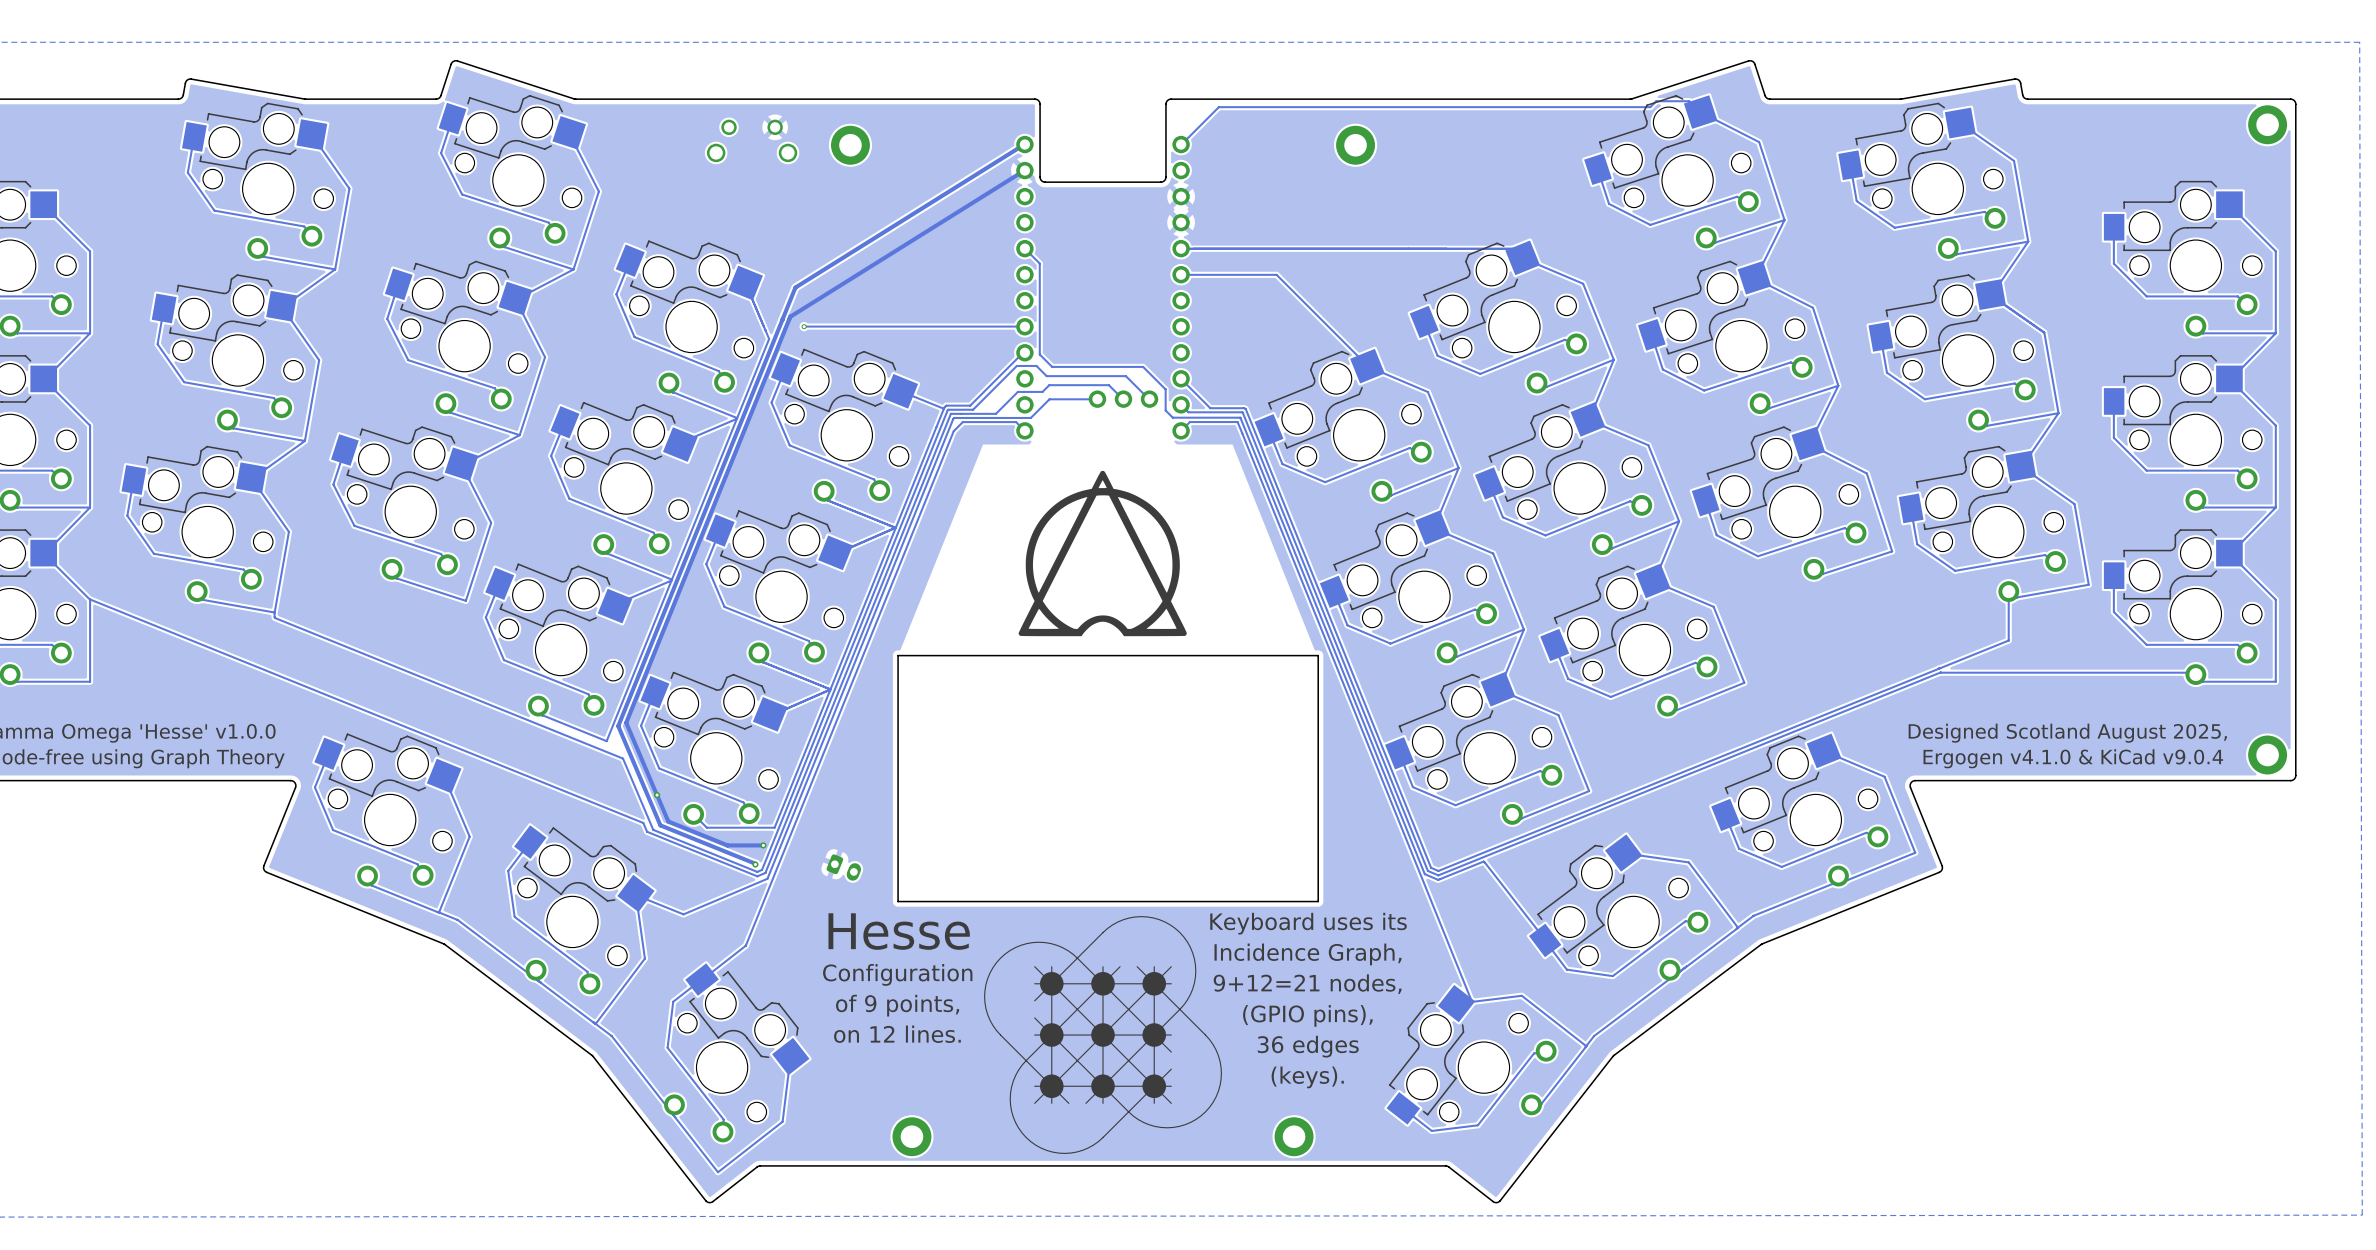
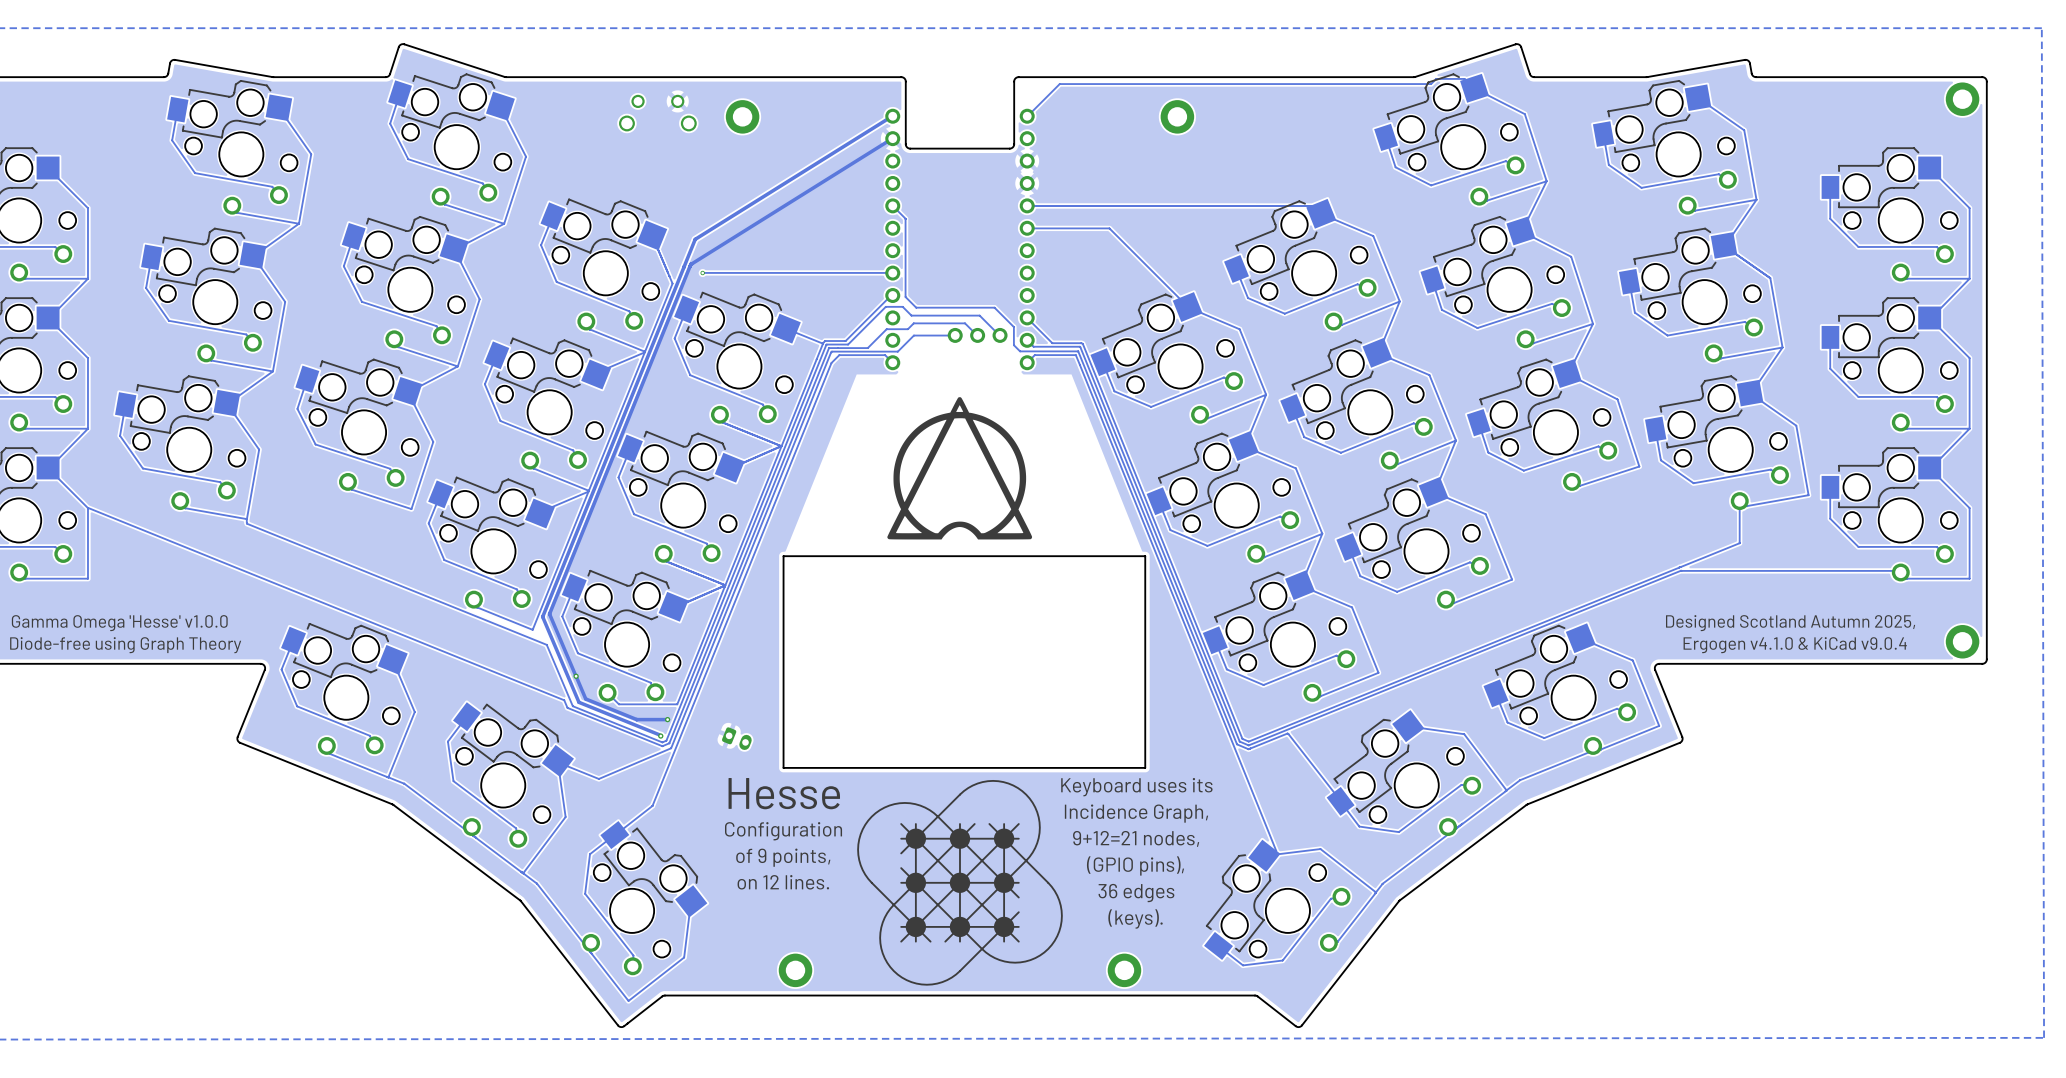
text: Designed Scotland August 2025, (2067, 733) -> Designed Scotland Autumn 2025, (1790, 623)

